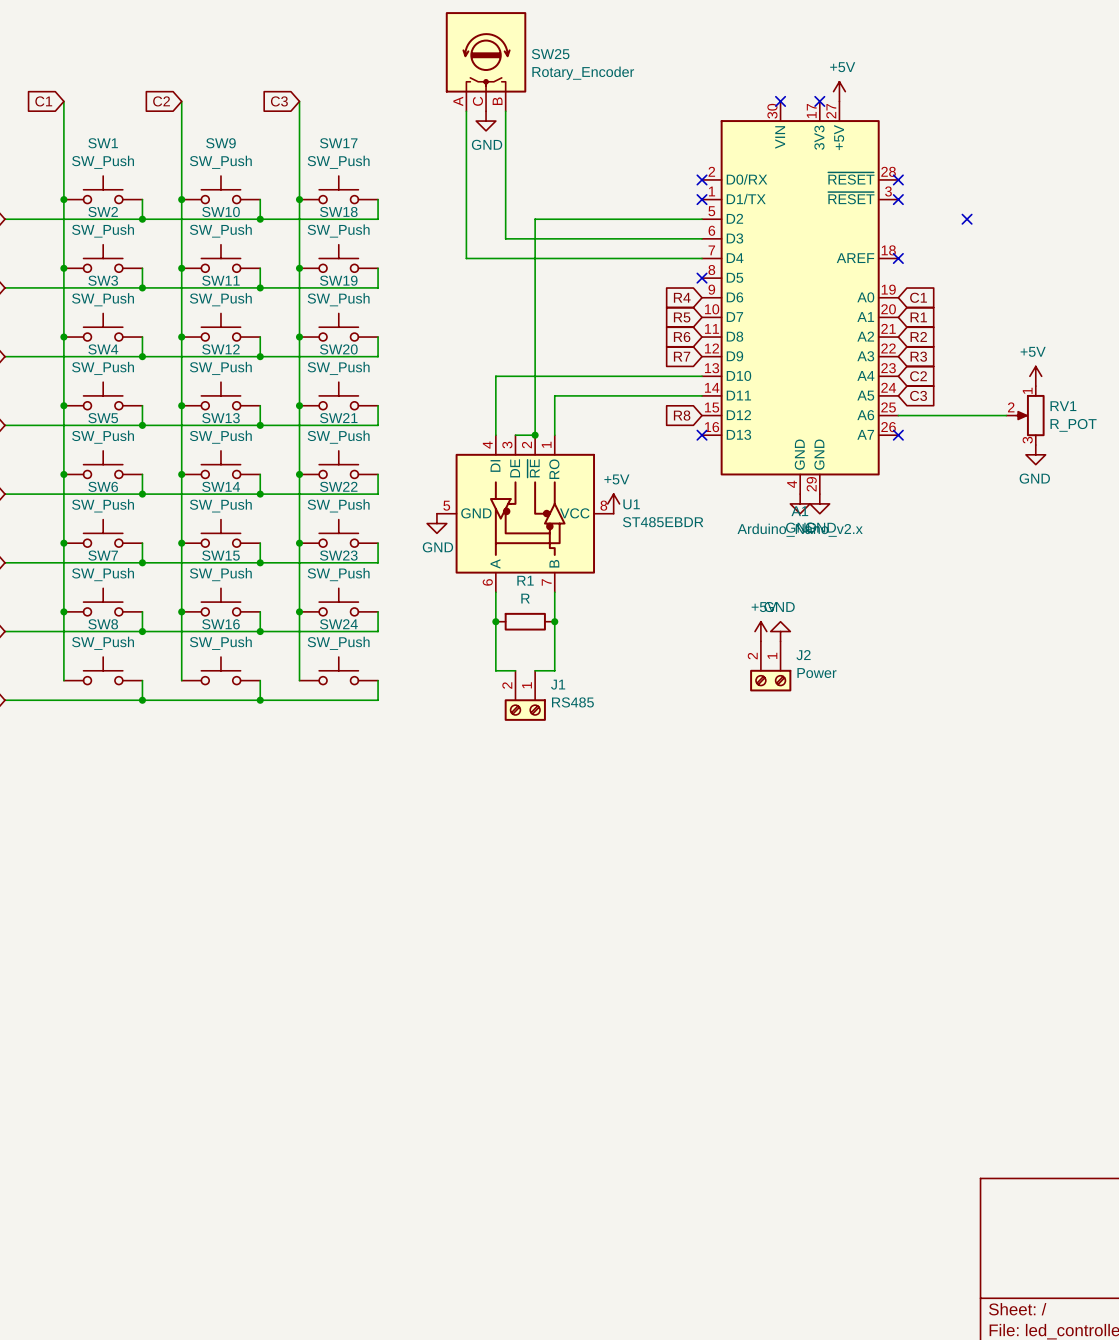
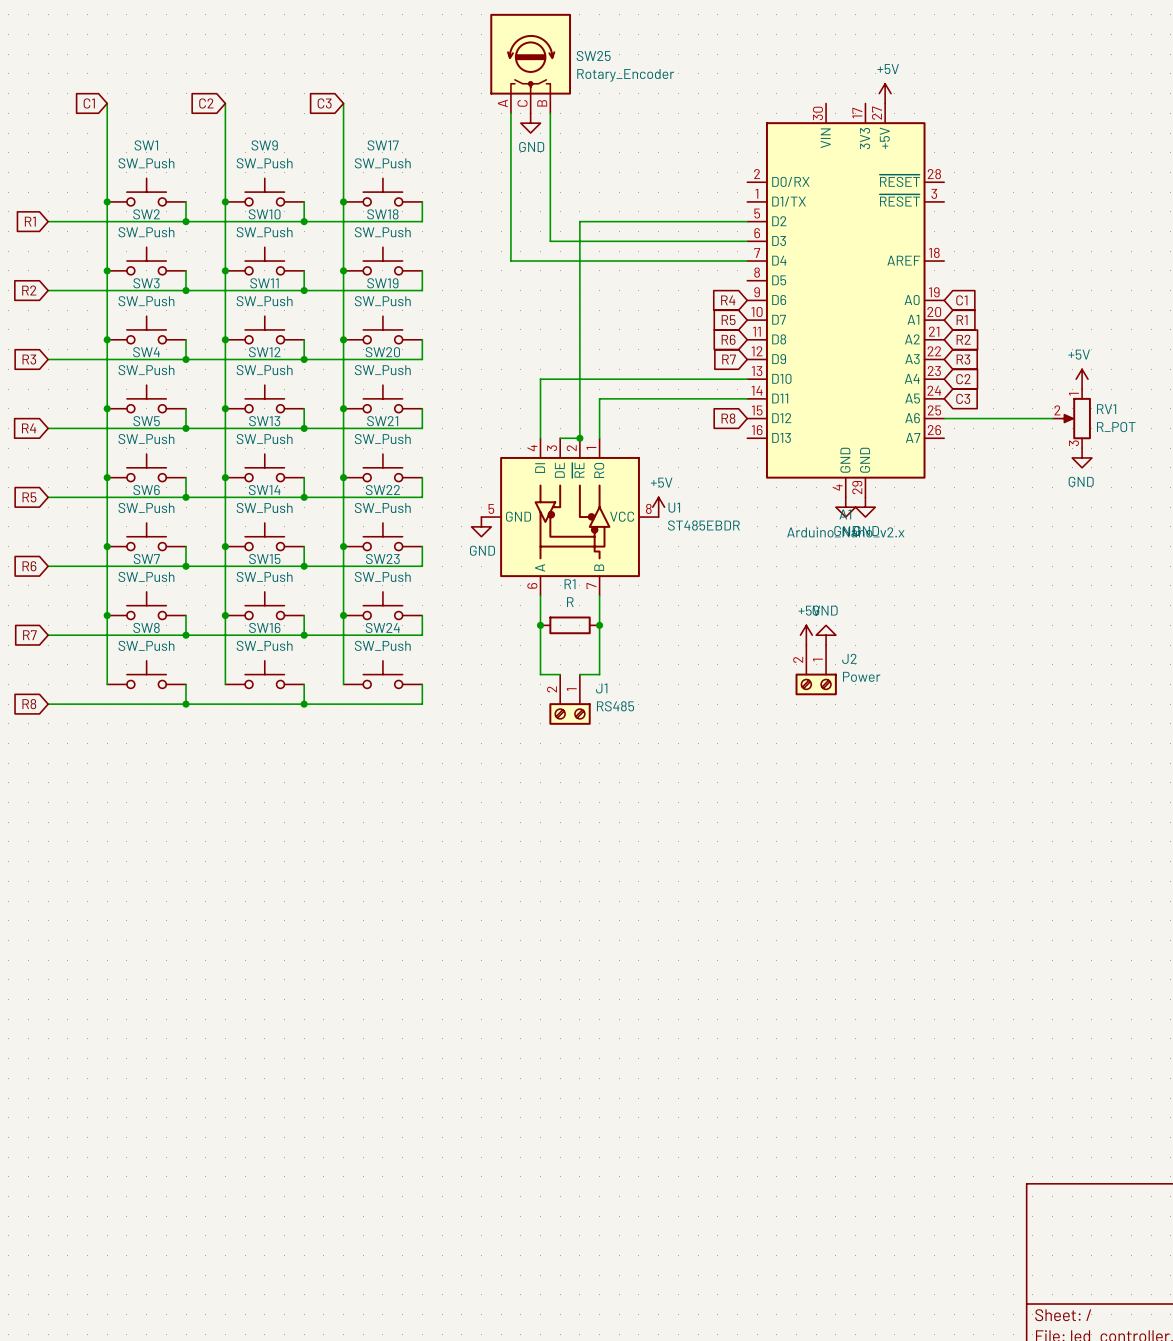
no-connect mark: (780, 101) -> none
no-connect mark: (819, 101) -> none
no-connect mark: (702, 179) -> none
no-connect mark: (898, 179) -> none
no-connect mark: (702, 199) -> none
no-connect mark: (898, 199) -> none
no-connect mark: (967, 219) -> none
no-connect mark: (898, 258) -> none
no-connect mark: (702, 278) -> none
no-connect mark: (702, 435) -> none
no-connect mark: (898, 435) -> none

